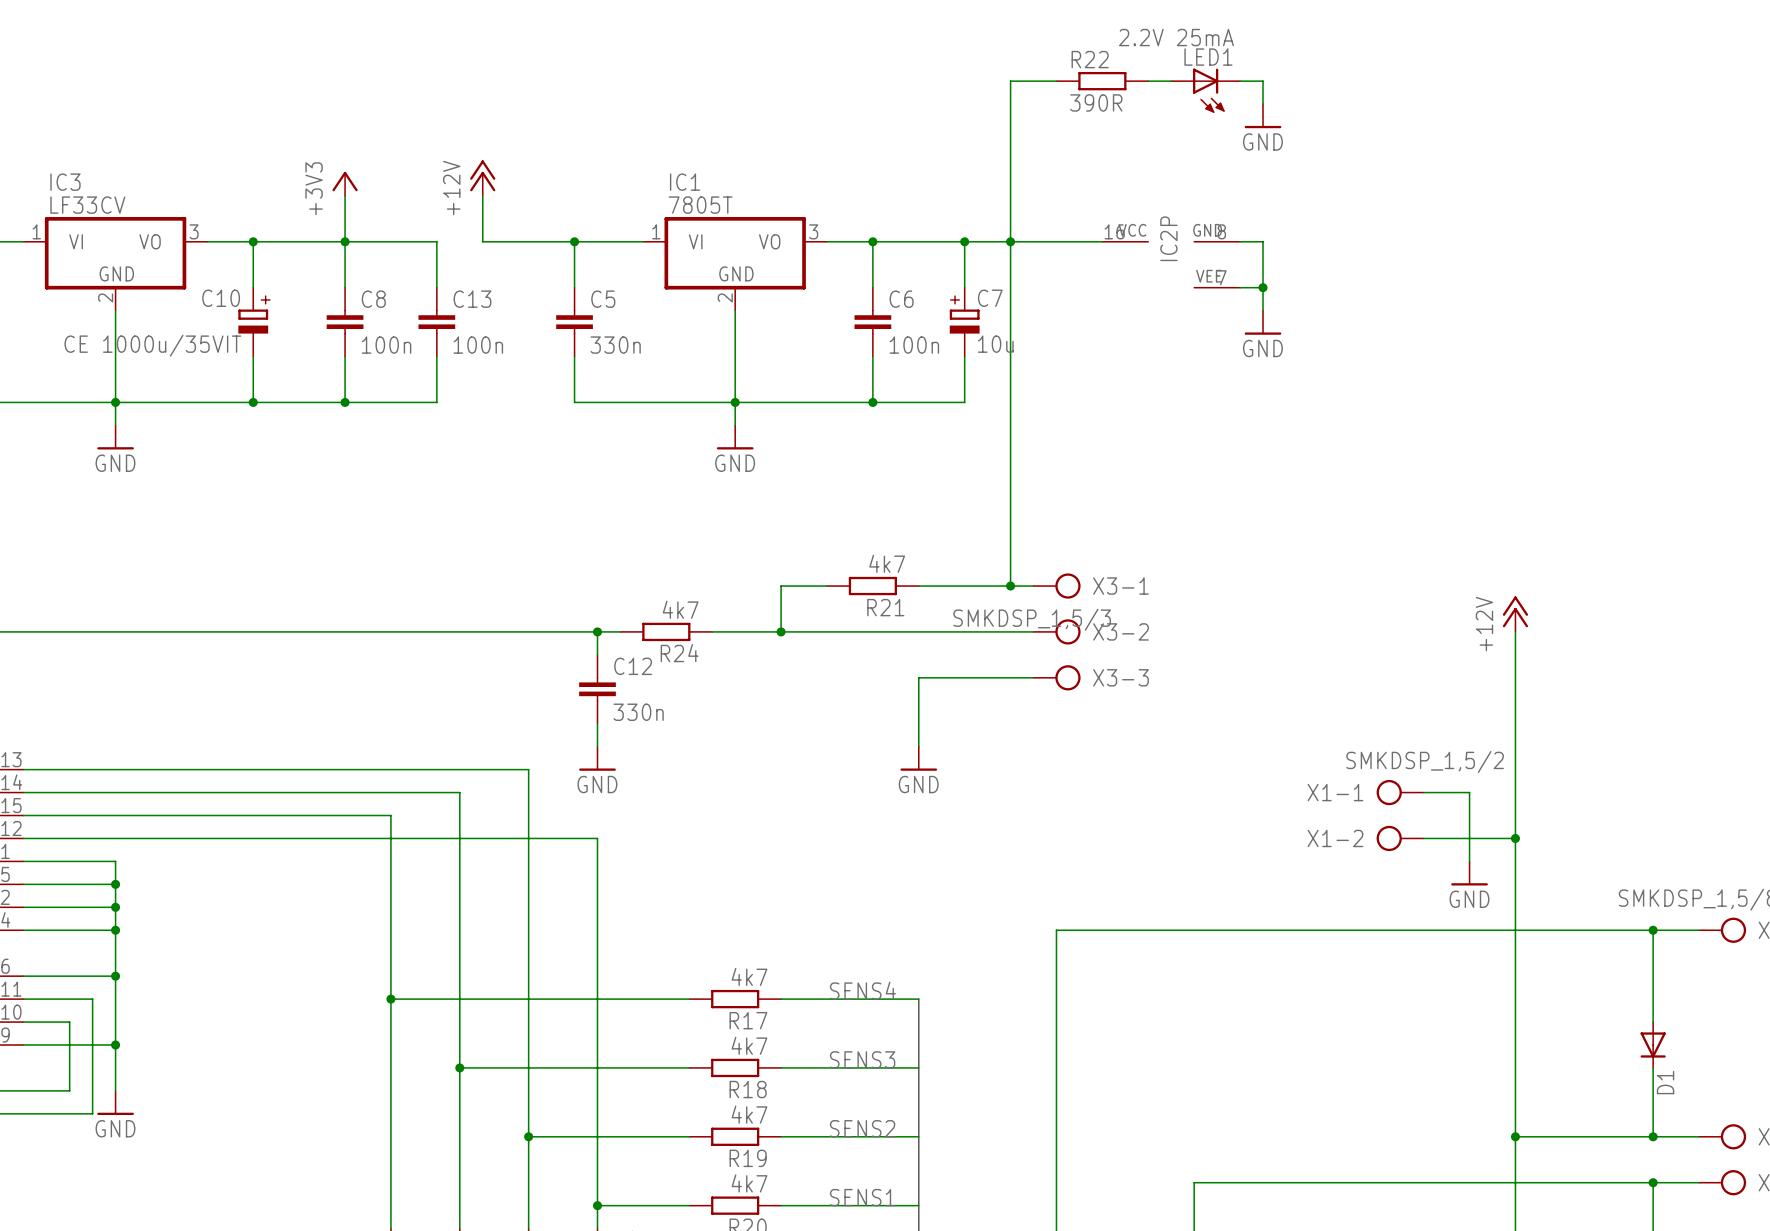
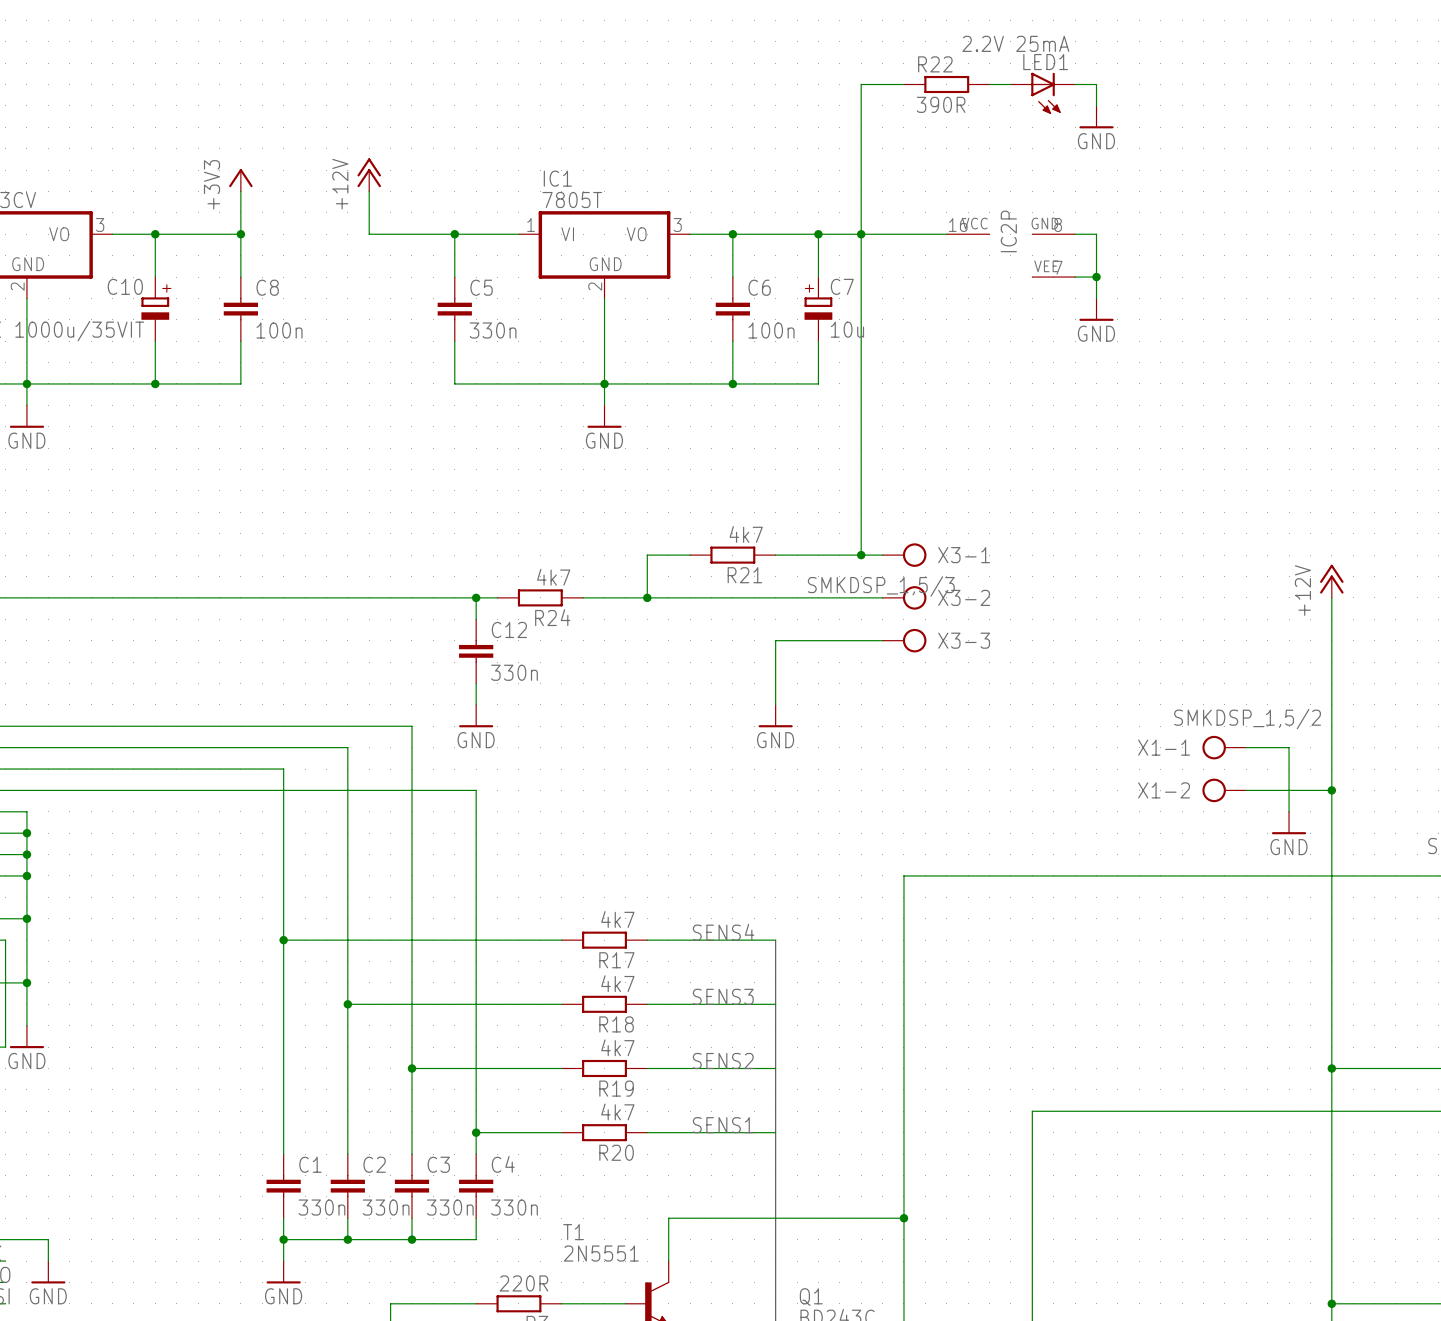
wire: (345, 241) (436, 241) (436, 287) -> none
C13: 100n (436, 322) -> none
wire: (436, 356) (436, 402) (345, 402) -> none
junction: (345, 402) -> none

